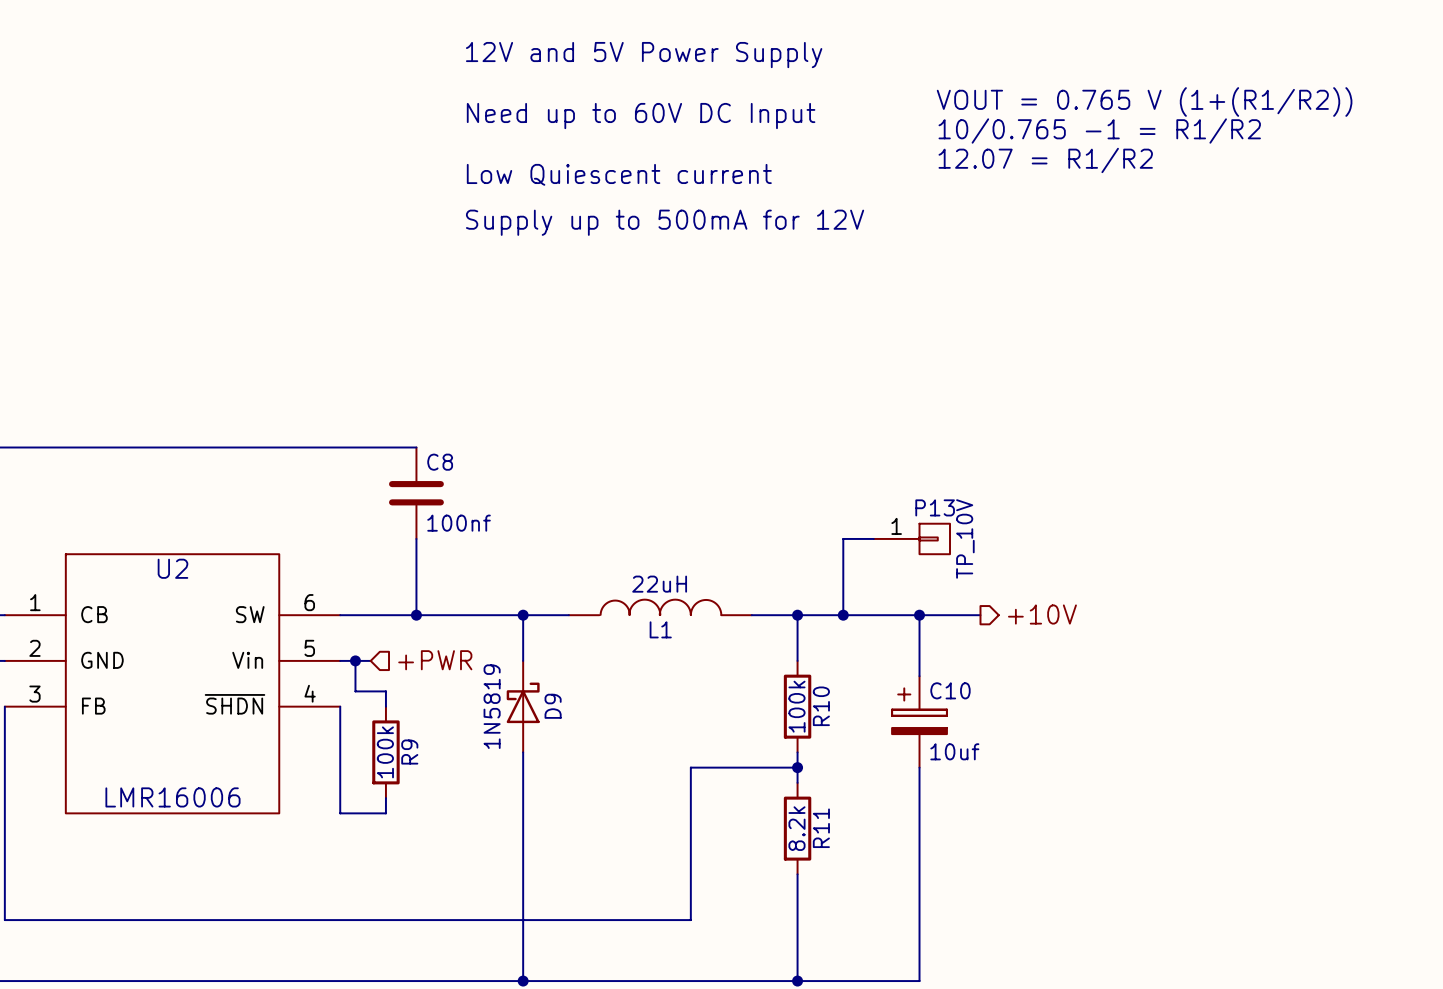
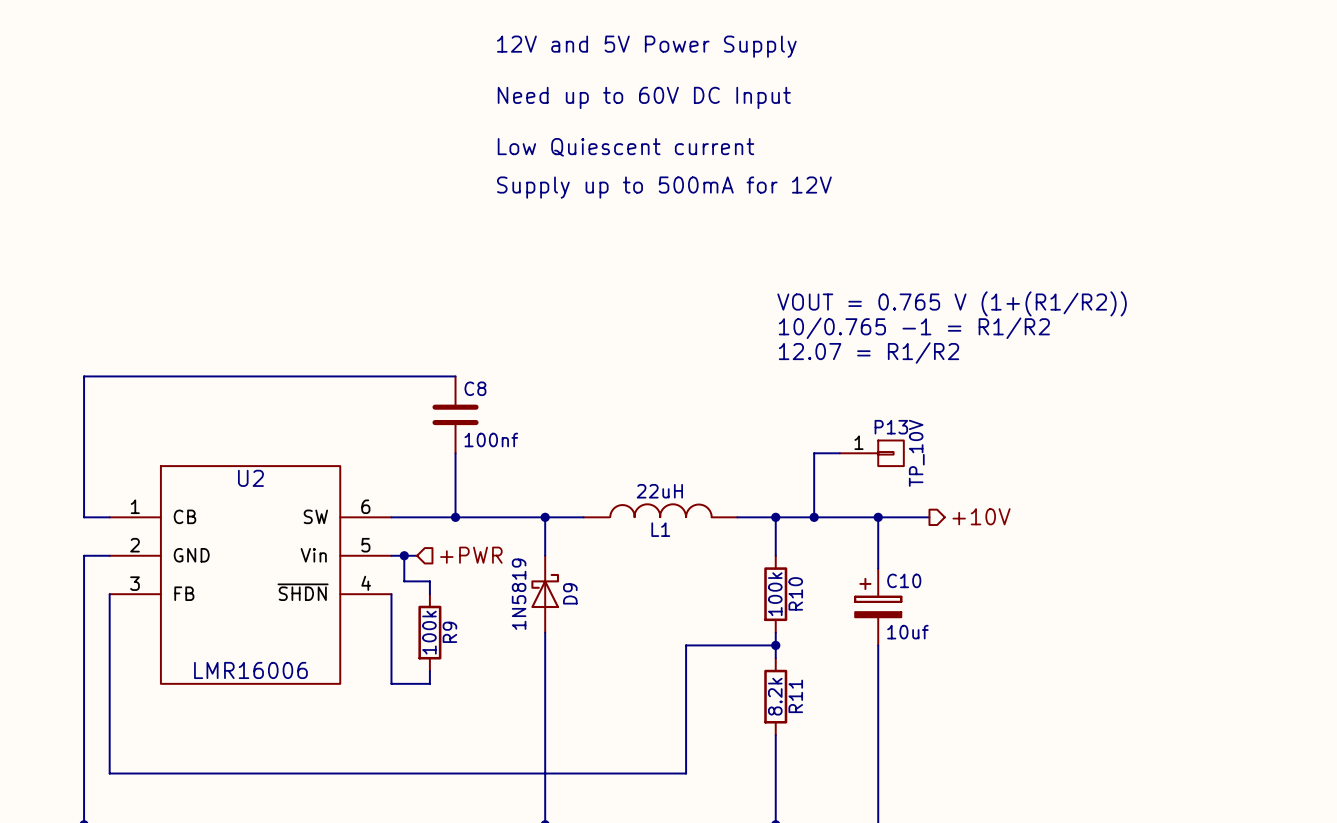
text position: VOUT = 0.765 V (1+(R1/R2)) (1144, 101) -> VOUT = 0.765 V (1+(R1/R2)) (952, 303)
text position: 10/0.765 -1 = R1/R2 (1099, 131) -> 10/0.765 -1 = R1/R2 (914, 328)
text position: 12.07 = R1/R2 (1045, 160) -> 12.07 = R1/R2 (868, 353)

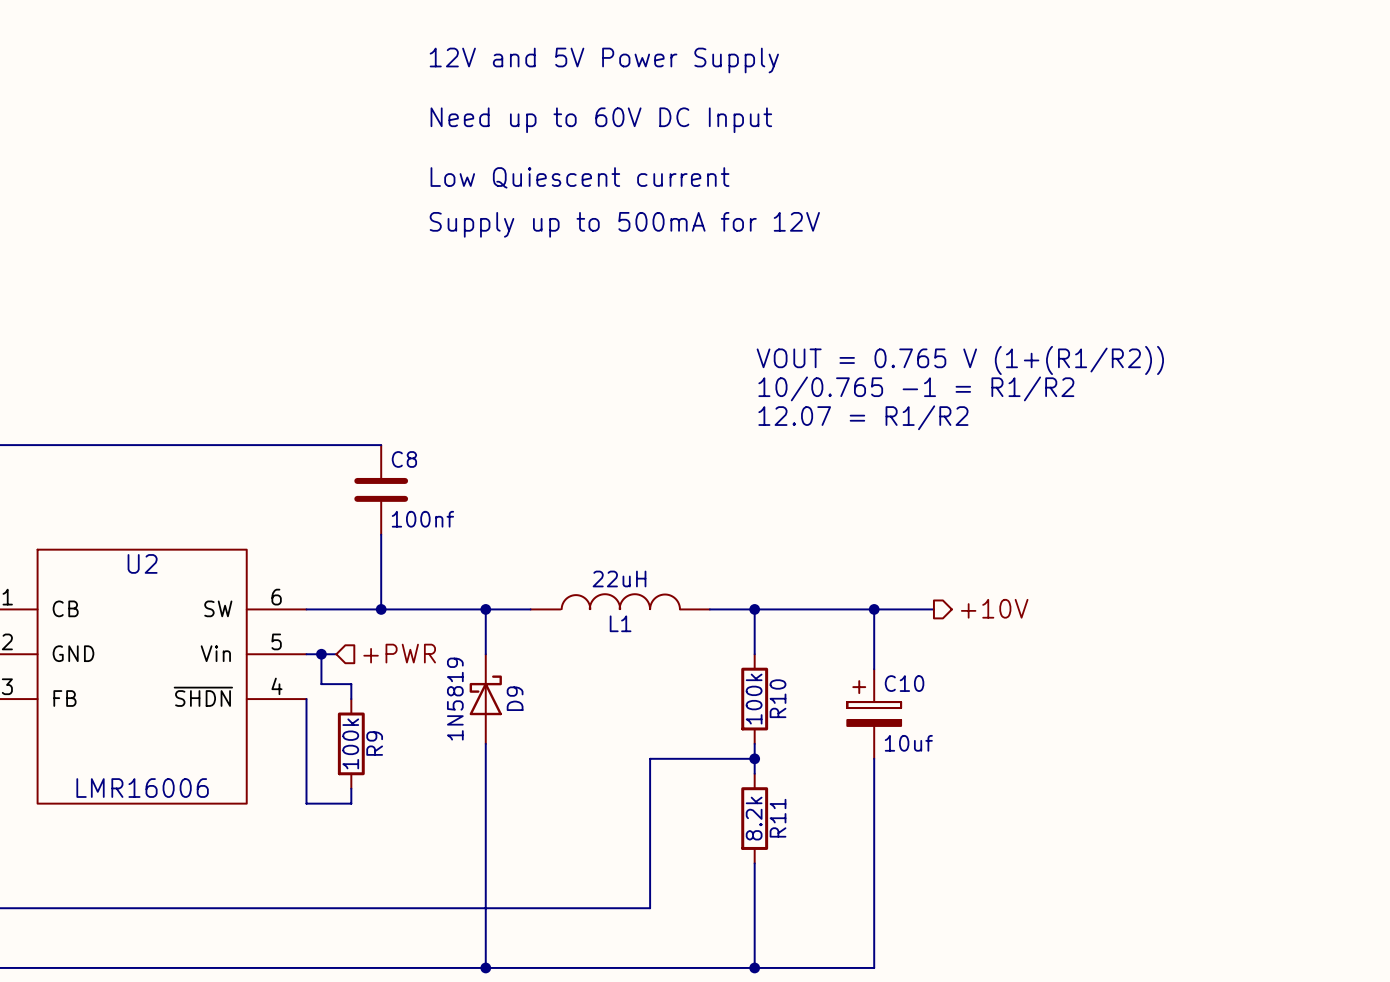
wire: (839, 453) (814, 453) (814, 517) -> none
P13: TP_10V (871, 453) -> none
junction: (814, 517) -> none

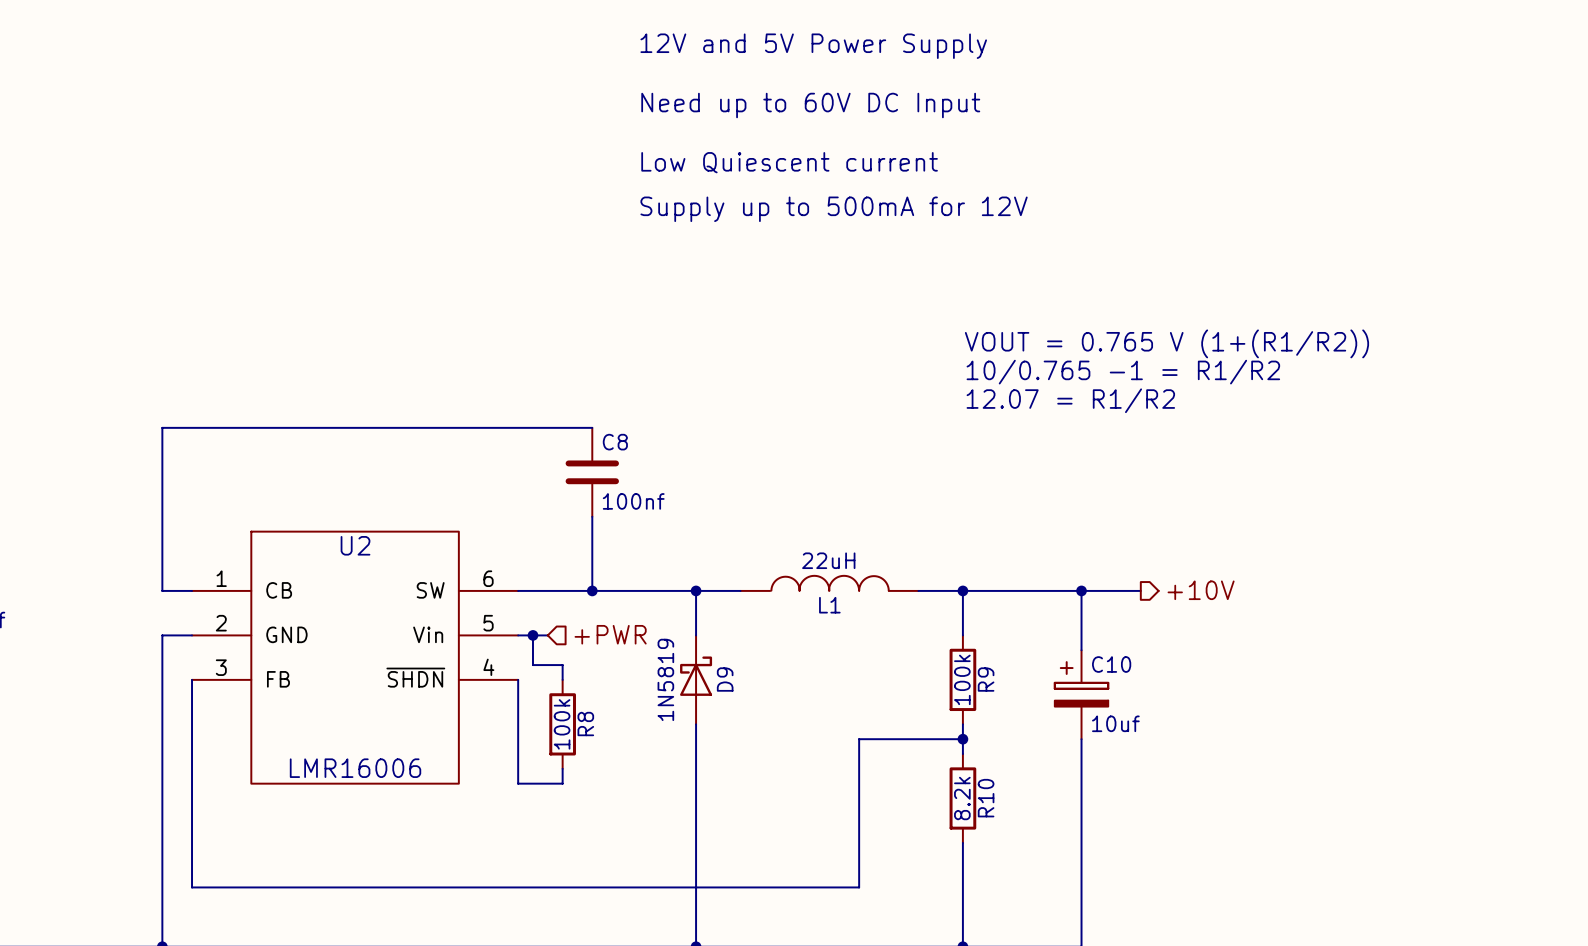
R10 name: R10 (778, 698) -> R9 (986, 679)
R9 name: R9 (374, 743) -> R8 (585, 724)
R11 name: R11 (778, 818) -> R10 (986, 798)

